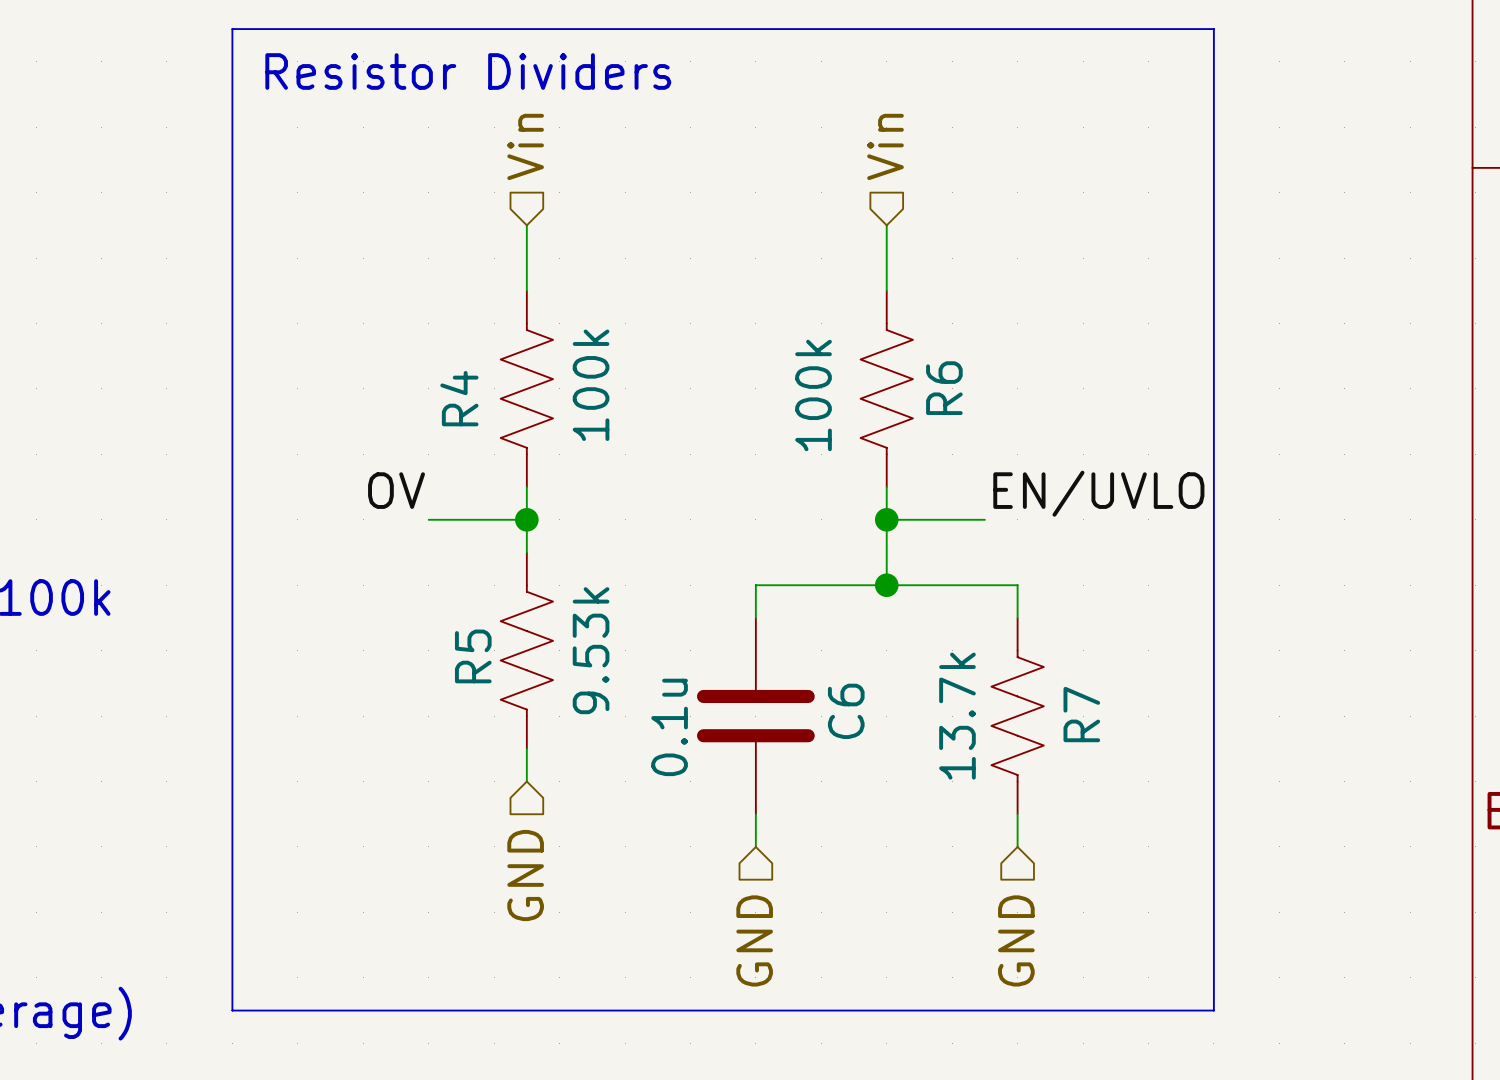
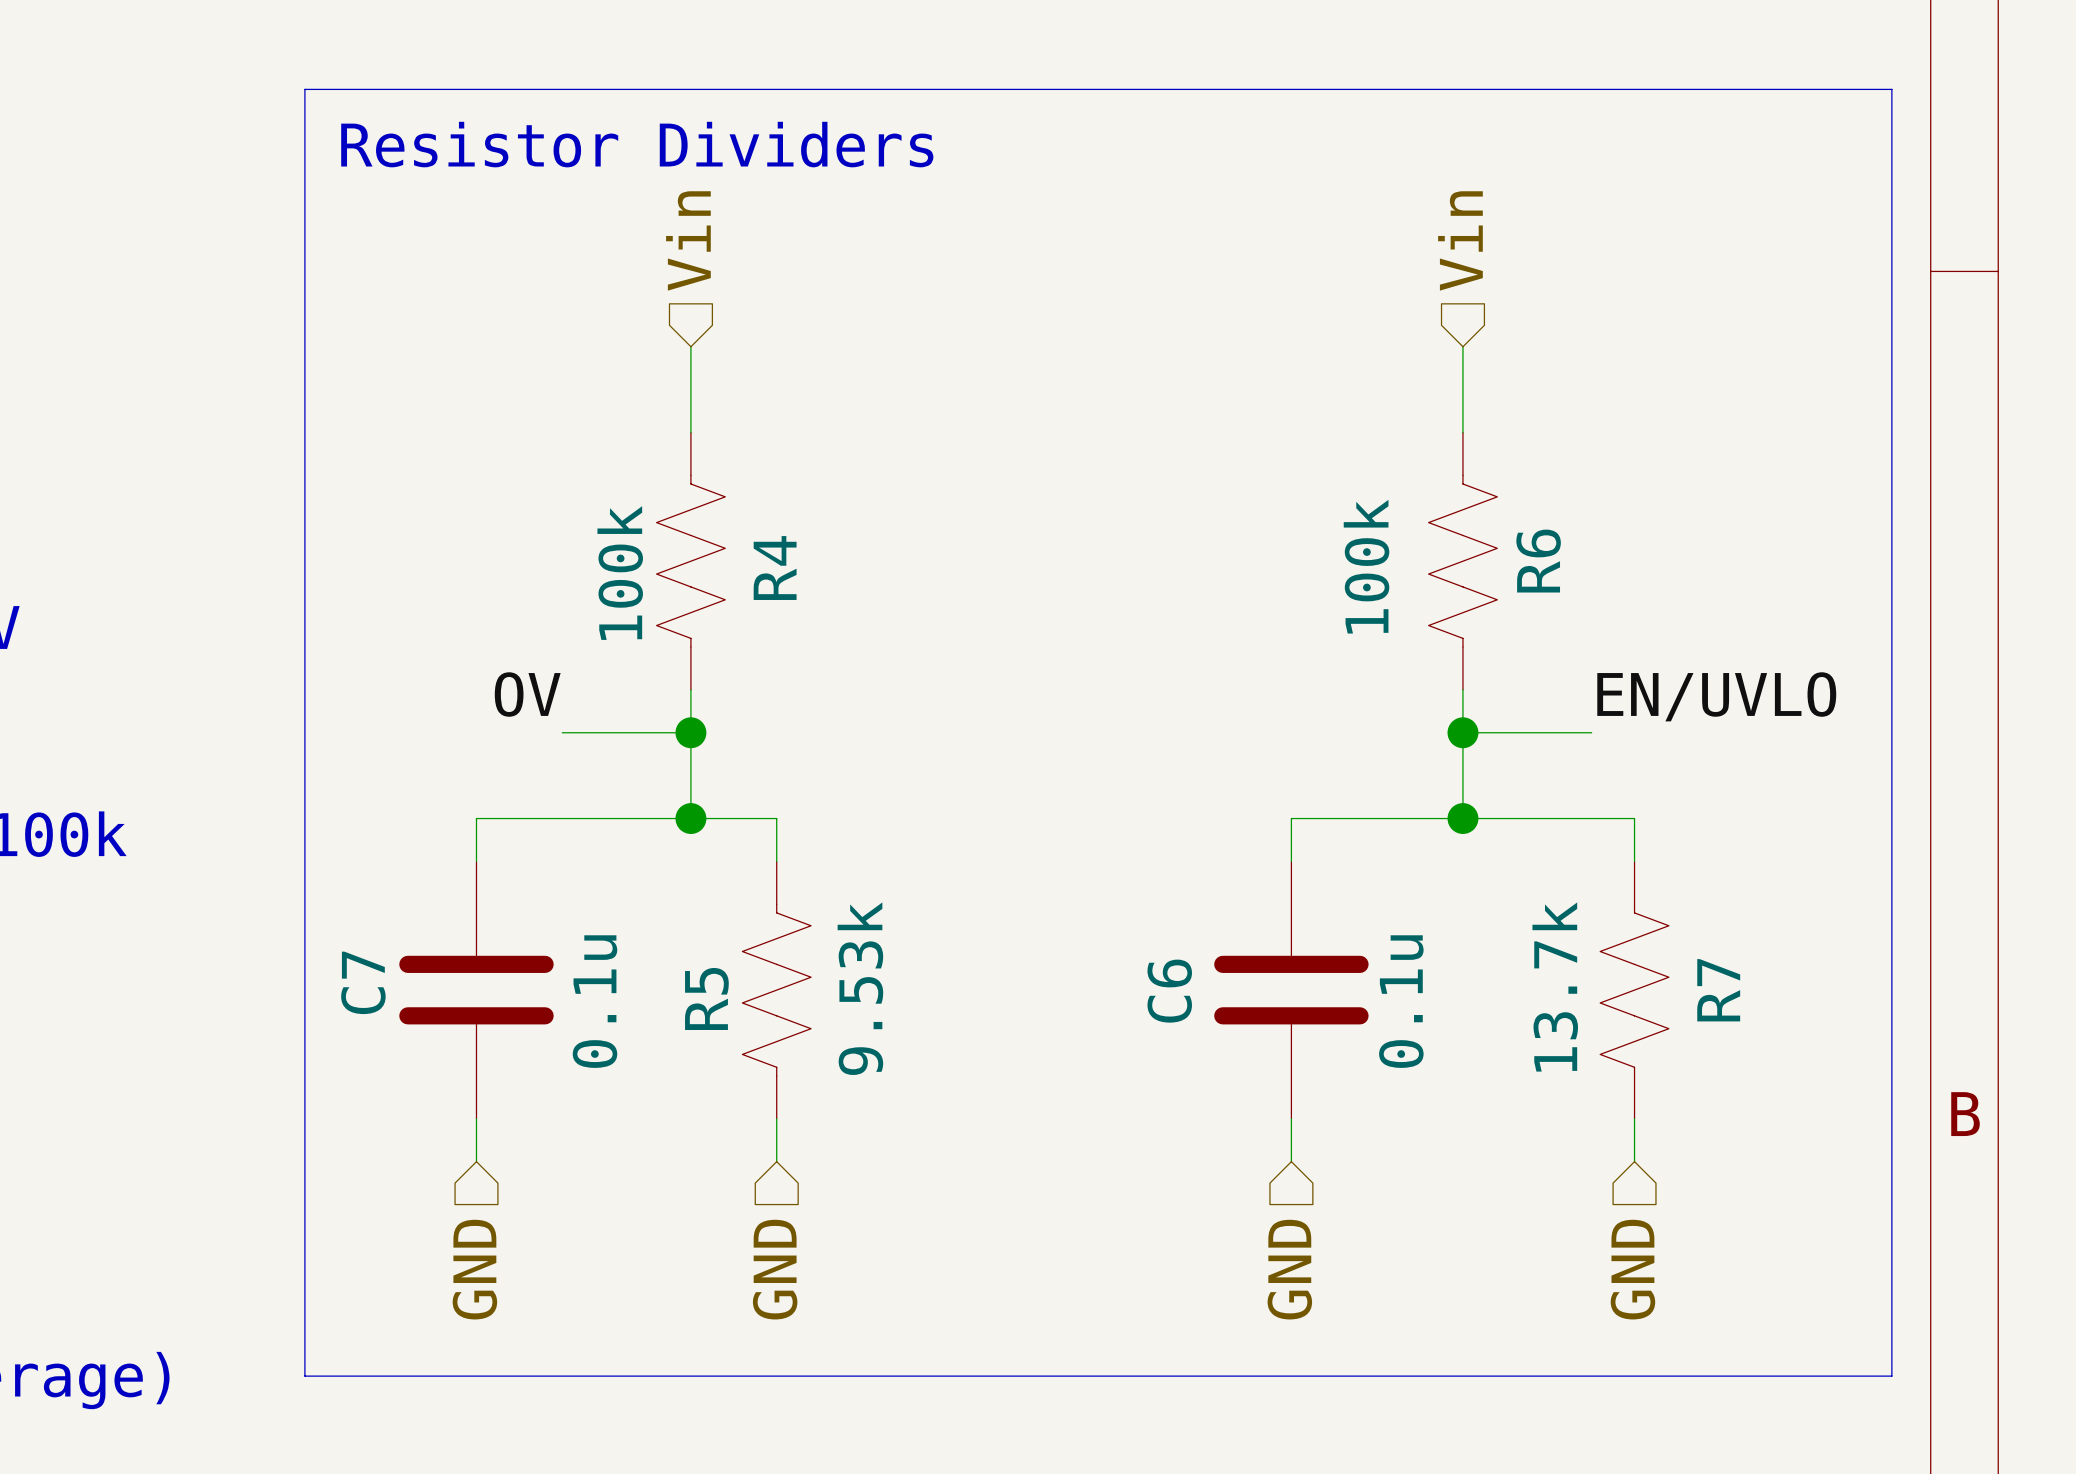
line: (1213, 29) (1213, 1010) -> (1591, 89) (1891, 89) (1891, 1376) (1591, 1376)
hierarchical label position: Vin (885, 146) -> Vin (1460, 240)
wire: (886, 225) (886, 290) -> (1462, 346) (1462, 432)
R4 value position: 100k (591, 385) -> 100k (620, 573)
R6 position: (886, 388) -> (1462, 561)
R4 name position: R4 (459, 398) -> R4 (775, 568)
wire: (886, 487) (886, 585) -> (1462, 689) (1462, 818)
label position: EN/UVLO (1098, 493) -> EN/UVLO (1716, 696)
wire: (886, 519) (984, 519) -> (1462, 732) (1591, 732)
junction: (886, 519) -> none
junction: none -> (1462, 732)
junction: none -> (690, 818)
junction: (886, 585) -> none
wire: (984, 585) (755, 585) (755, 617) -> (1291, 818) (1291, 861)
wire: (1017, 585) (1017, 617) -> (1334, 818) (1634, 818) (1634, 861)
junction: none -> (1462, 818)
wire: none -> (476, 861) (476, 818) (776, 818) (776, 861)
R5 position: (526, 650) -> (776, 990)
C6 name position: C6 (846, 711) -> C6 (1169, 991)
C7: none -> 0.1u (476, 990)
C6 position: (755, 716) -> (1291, 990)
R7 position: (1017, 716) -> (1634, 990)
C6 value position: 0.1u (669, 727) -> 0.1u (1401, 1001)
wire: (526, 748) (526, 781) -> (776, 1118) (776, 1161)
wire: none -> (476, 1118) (476, 1161)
wire: (755, 814) (755, 846) -> (1291, 1118) (1291, 1161)
wire: (1017, 814) (1017, 846) -> (1634, 1118) (1634, 1161)
hierarchical label position: GND (525, 875) -> GND (775, 1269)
hierarchical label: none -> GND (474, 1269)
hierarchical label: GND (754, 940) -> none
hierarchical label position: GND (1016, 940) -> GND (1289, 1269)
hierarchical label: none -> GND (1632, 1269)

